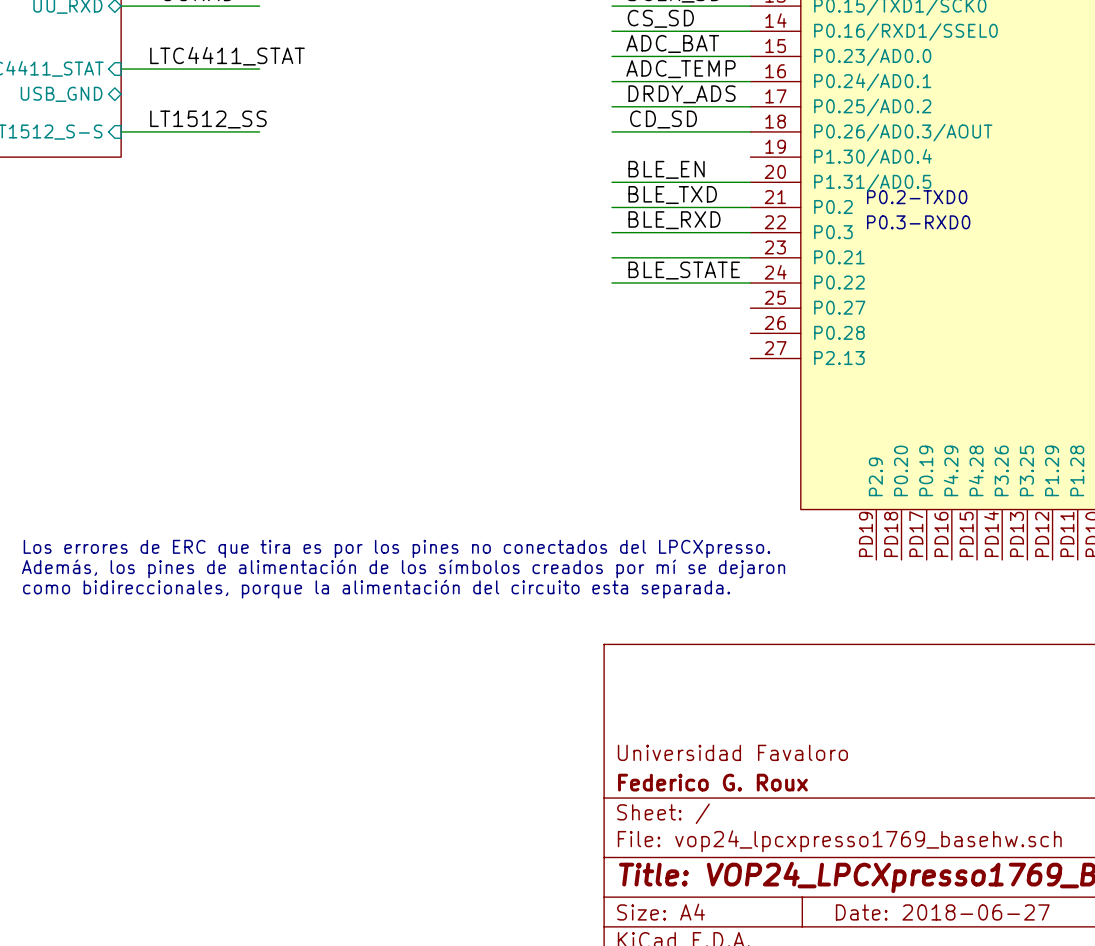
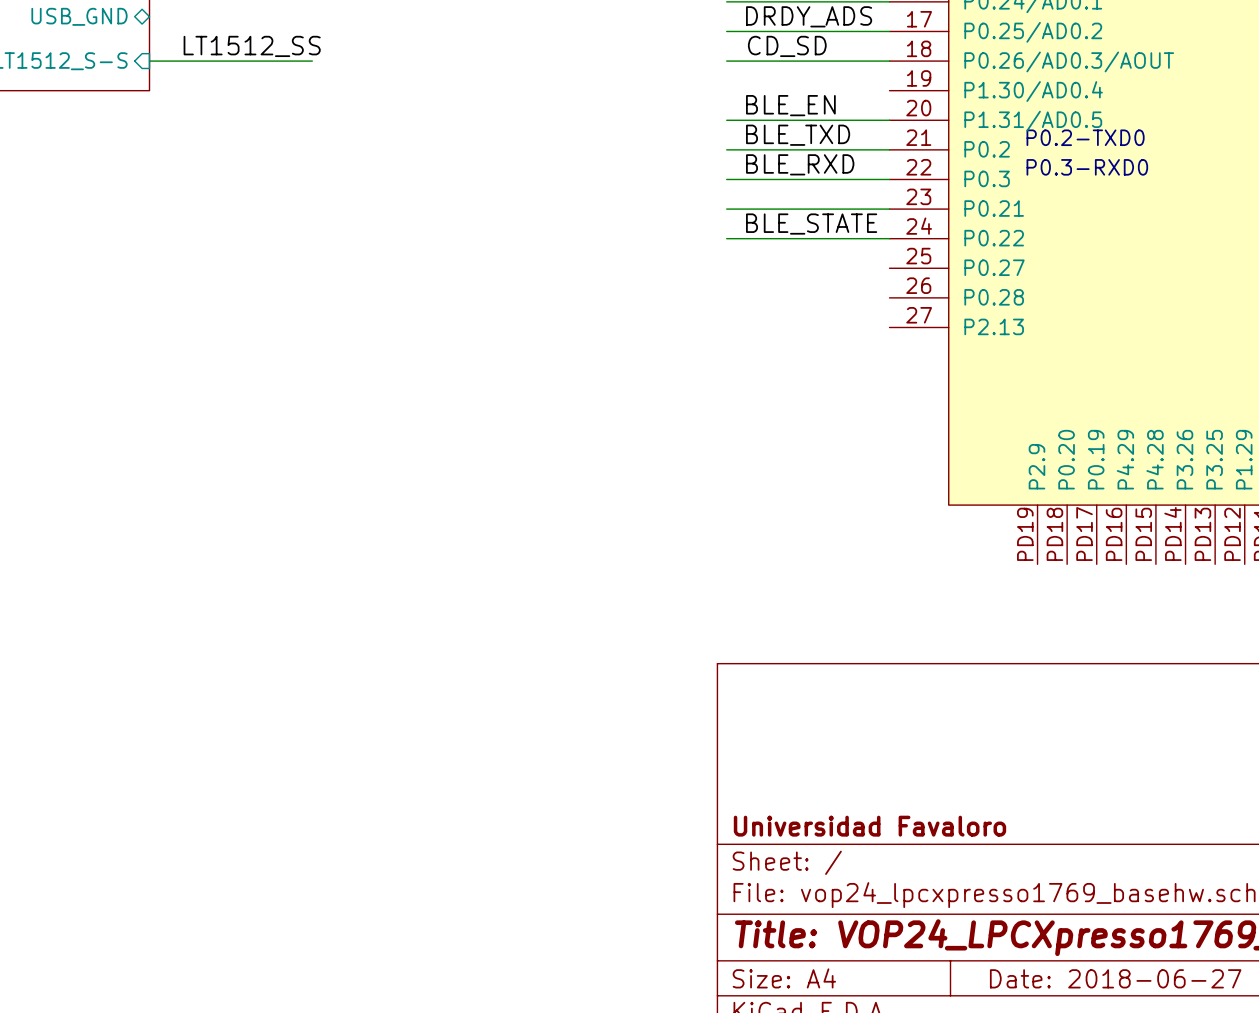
text: Los errores de ERC que tira es por los pines no conectados del LPCXpresso. (396, 548) -> none
text: Además, los pines de alimentación de los símbolos creados por mí se dejaron (403, 568) -> none
text: como bidireccionales, porque la alimentación del circuito esta separada. (376, 589) -> none
title block: Universidad Favaloro (732, 752) -> none
title block: Federico G. Roux (712, 782) -> Universidad Favaloro (869, 826)

